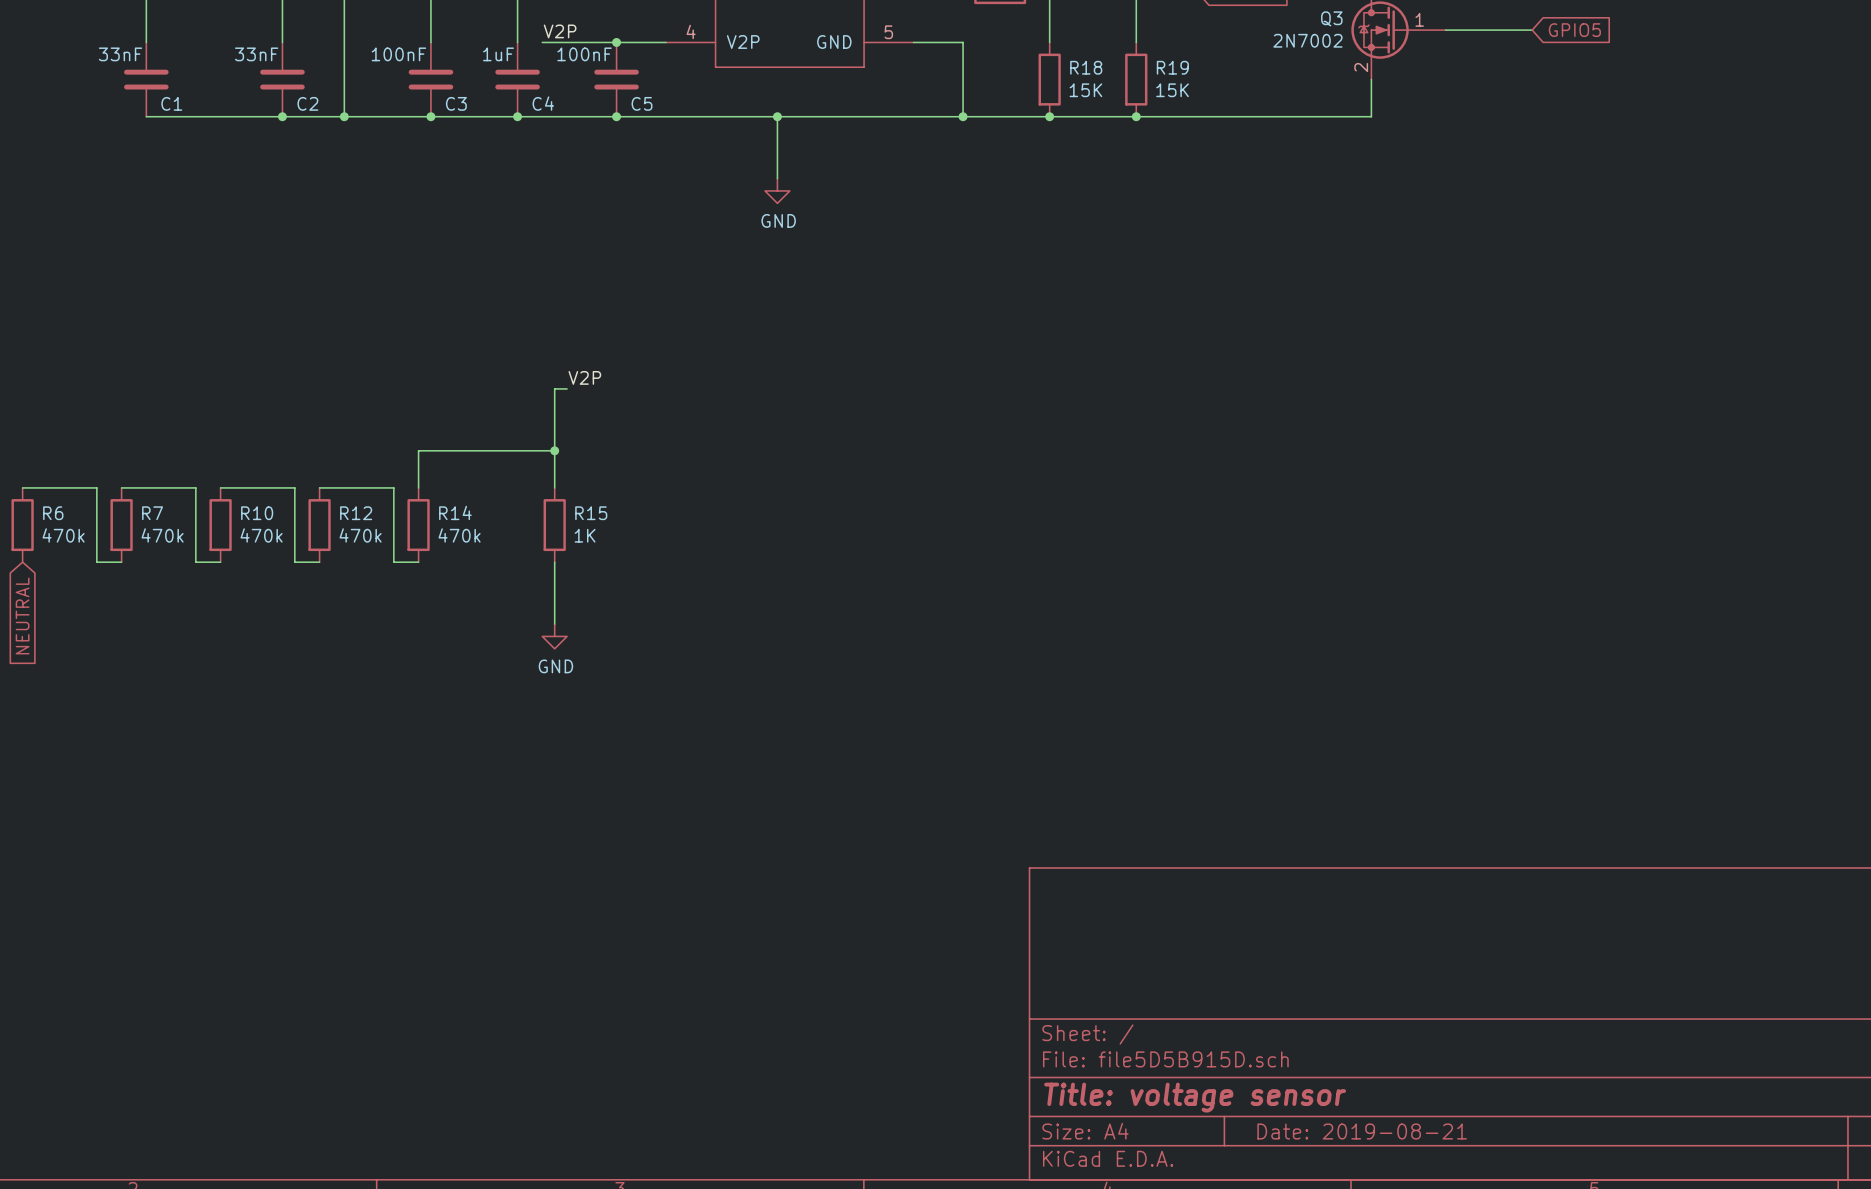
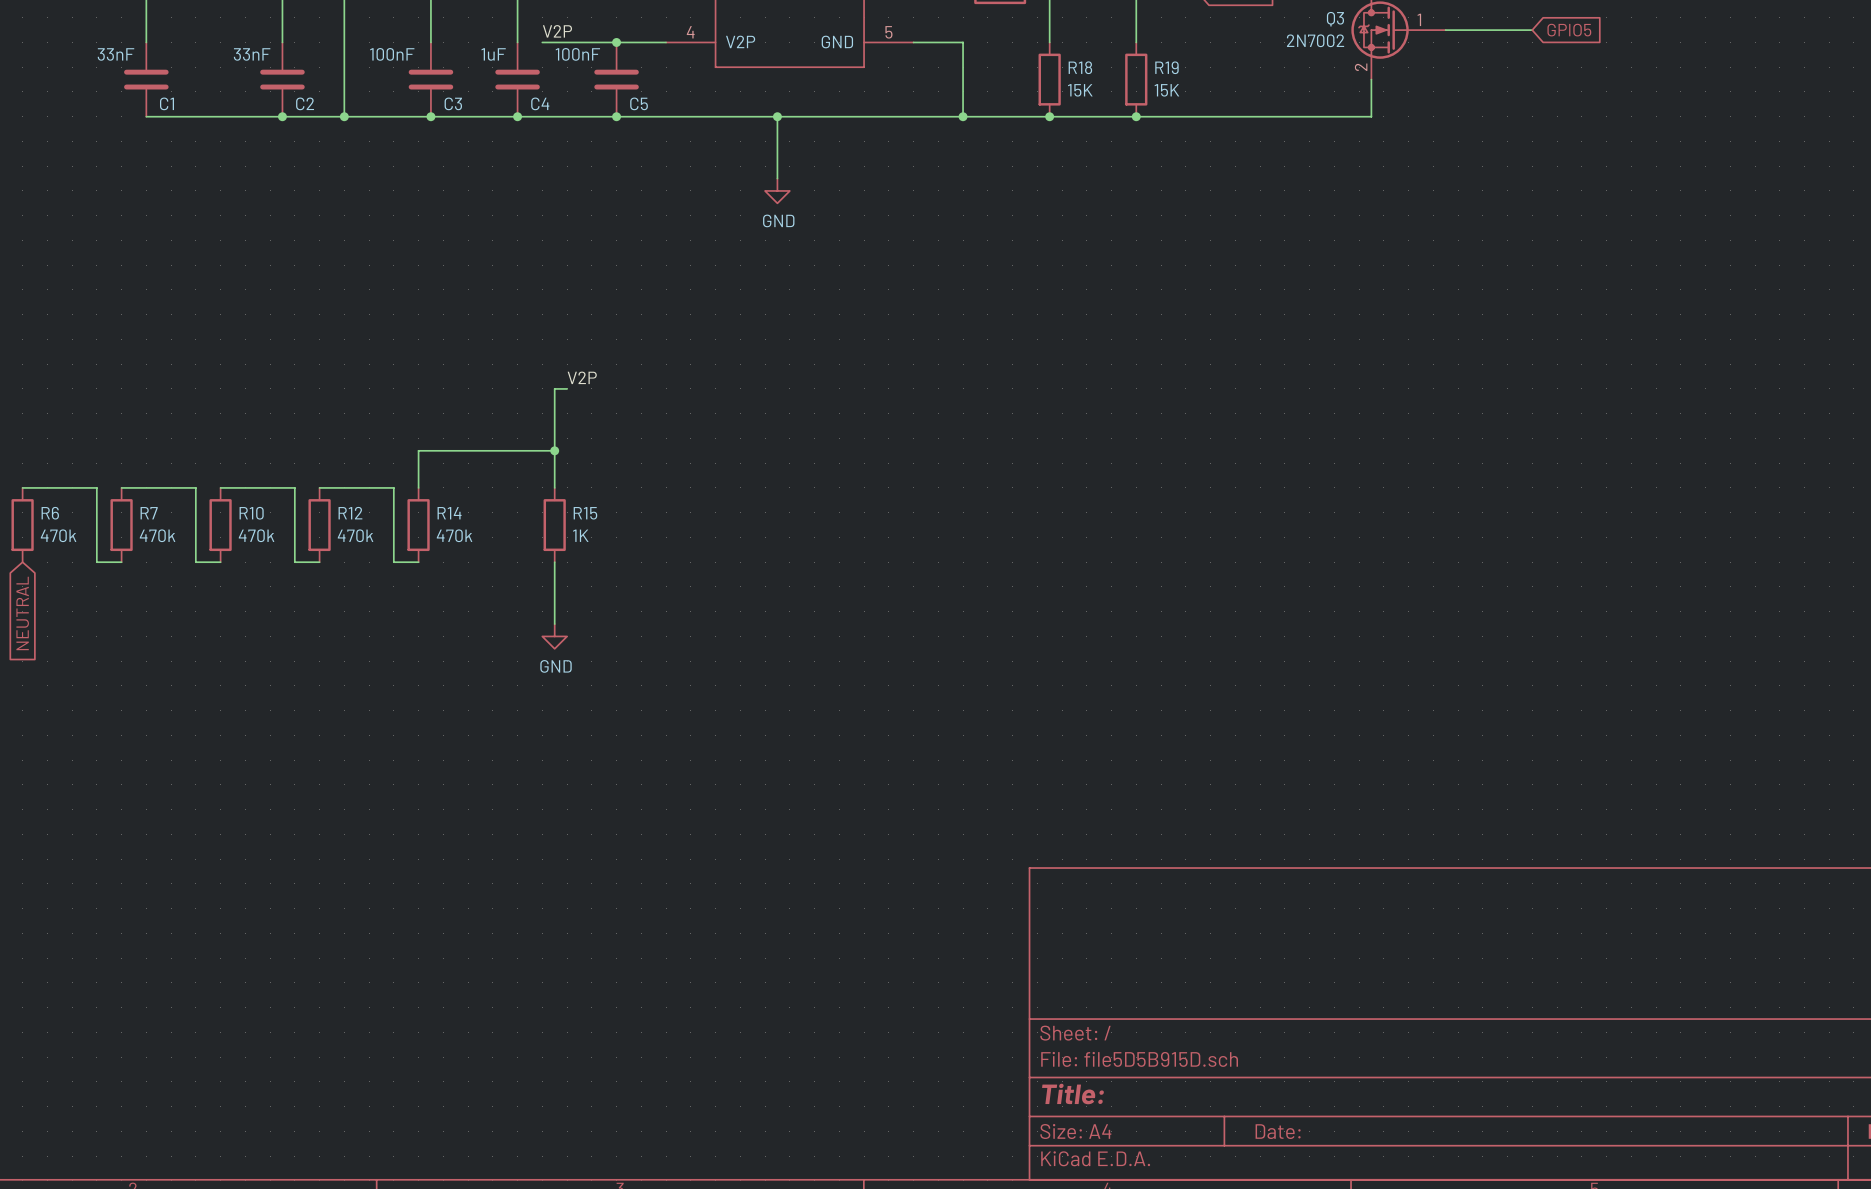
title block: Title: voltage sensor (1195, 1097) -> Title: (1073, 1094)
title block: Date: 2019-08-21 (1362, 1131) -> Date: (1278, 1131)

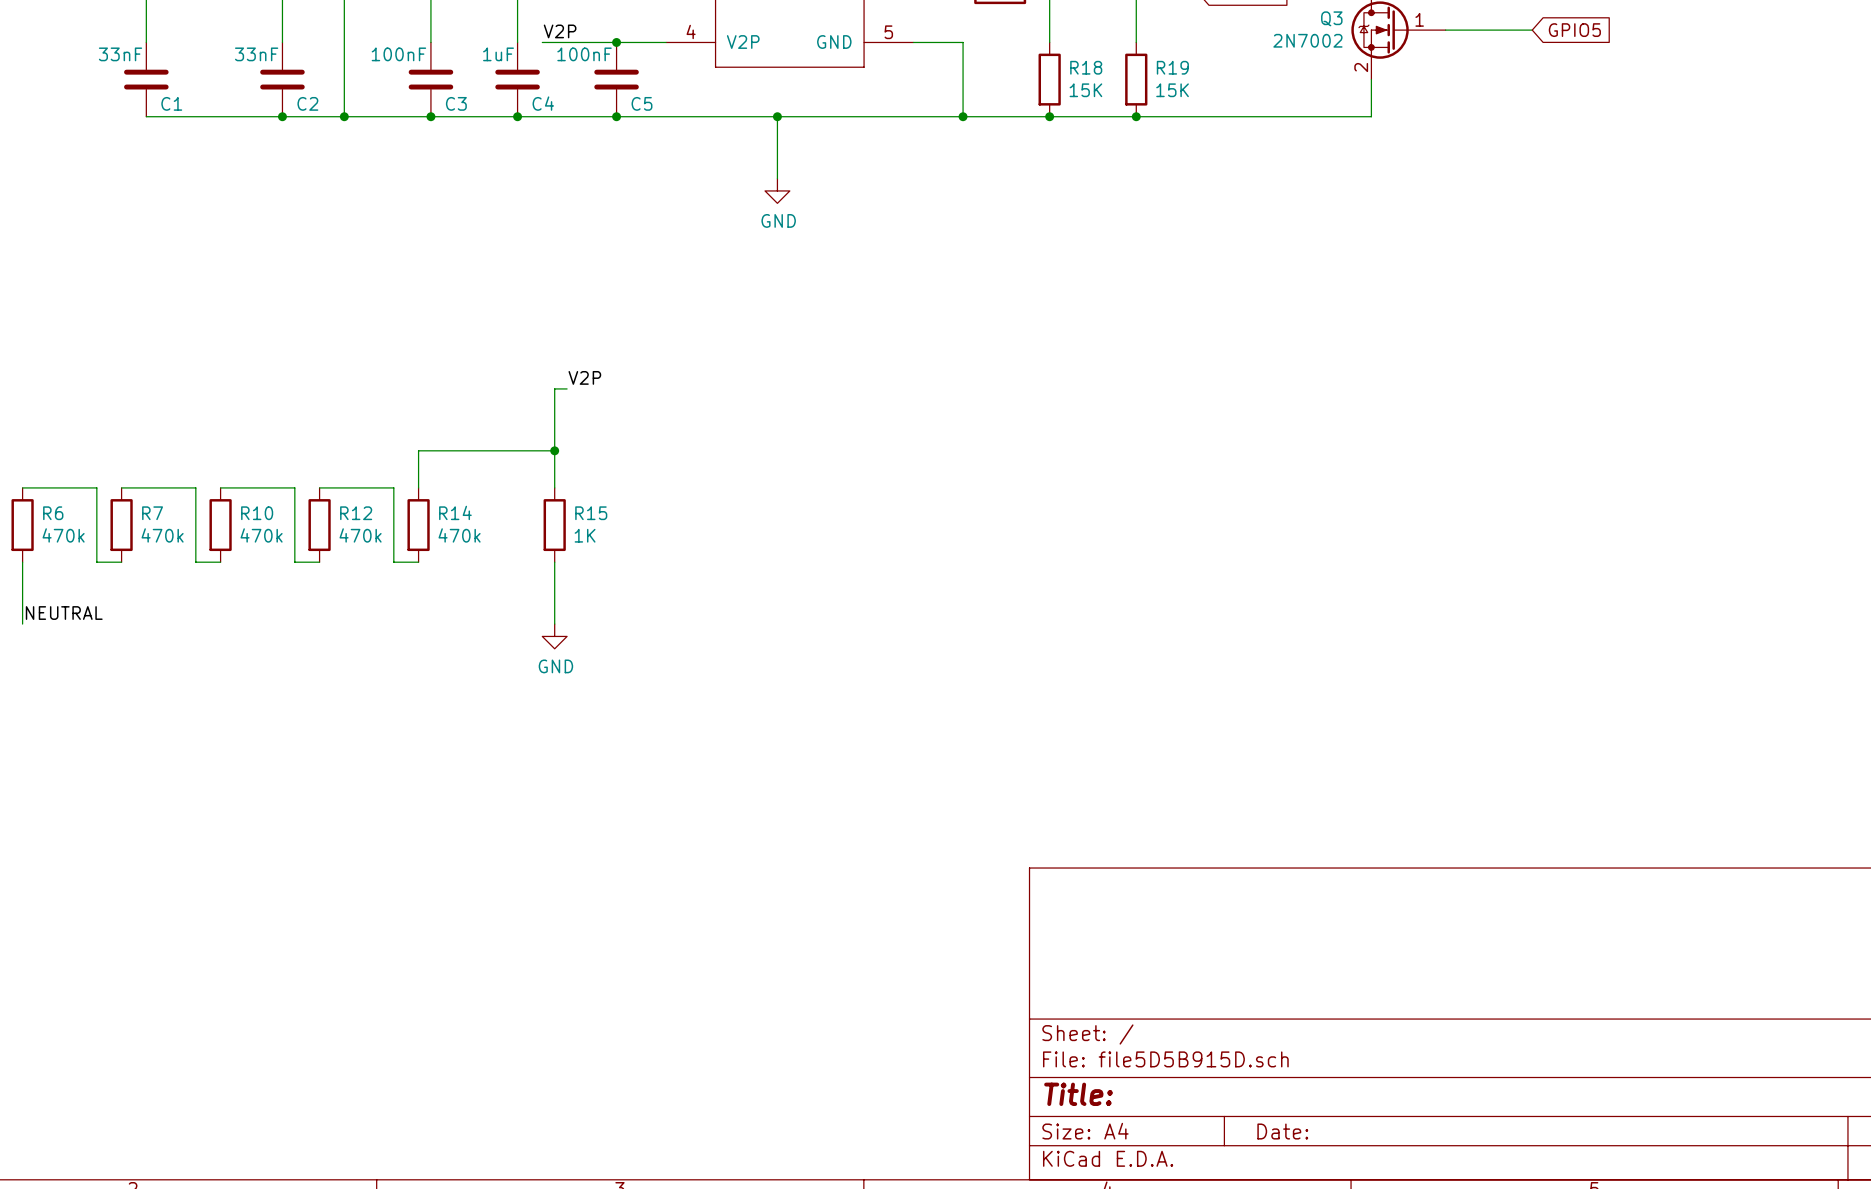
wire: none -> (22, 562) (22, 624)
global label: NEUTRAL (22, 613) -> none
label: none -> NEUTRAL (64, 613)

